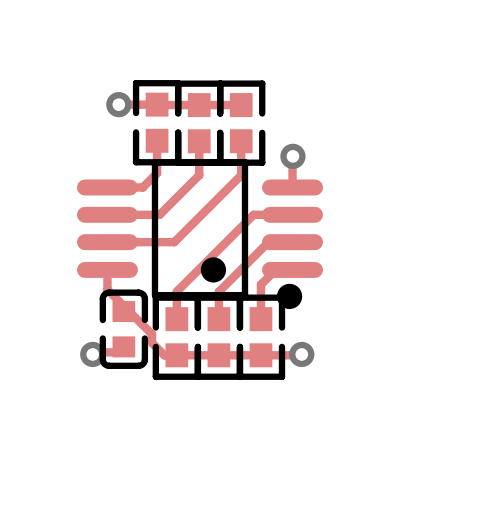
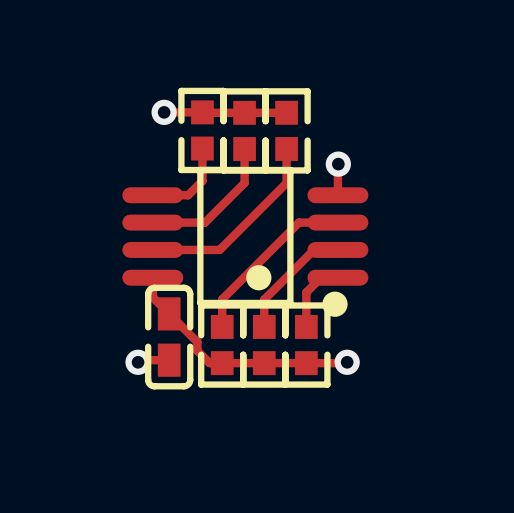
part footprint: [99, 289, 149, 369] -> [145, 284, 194, 390]

